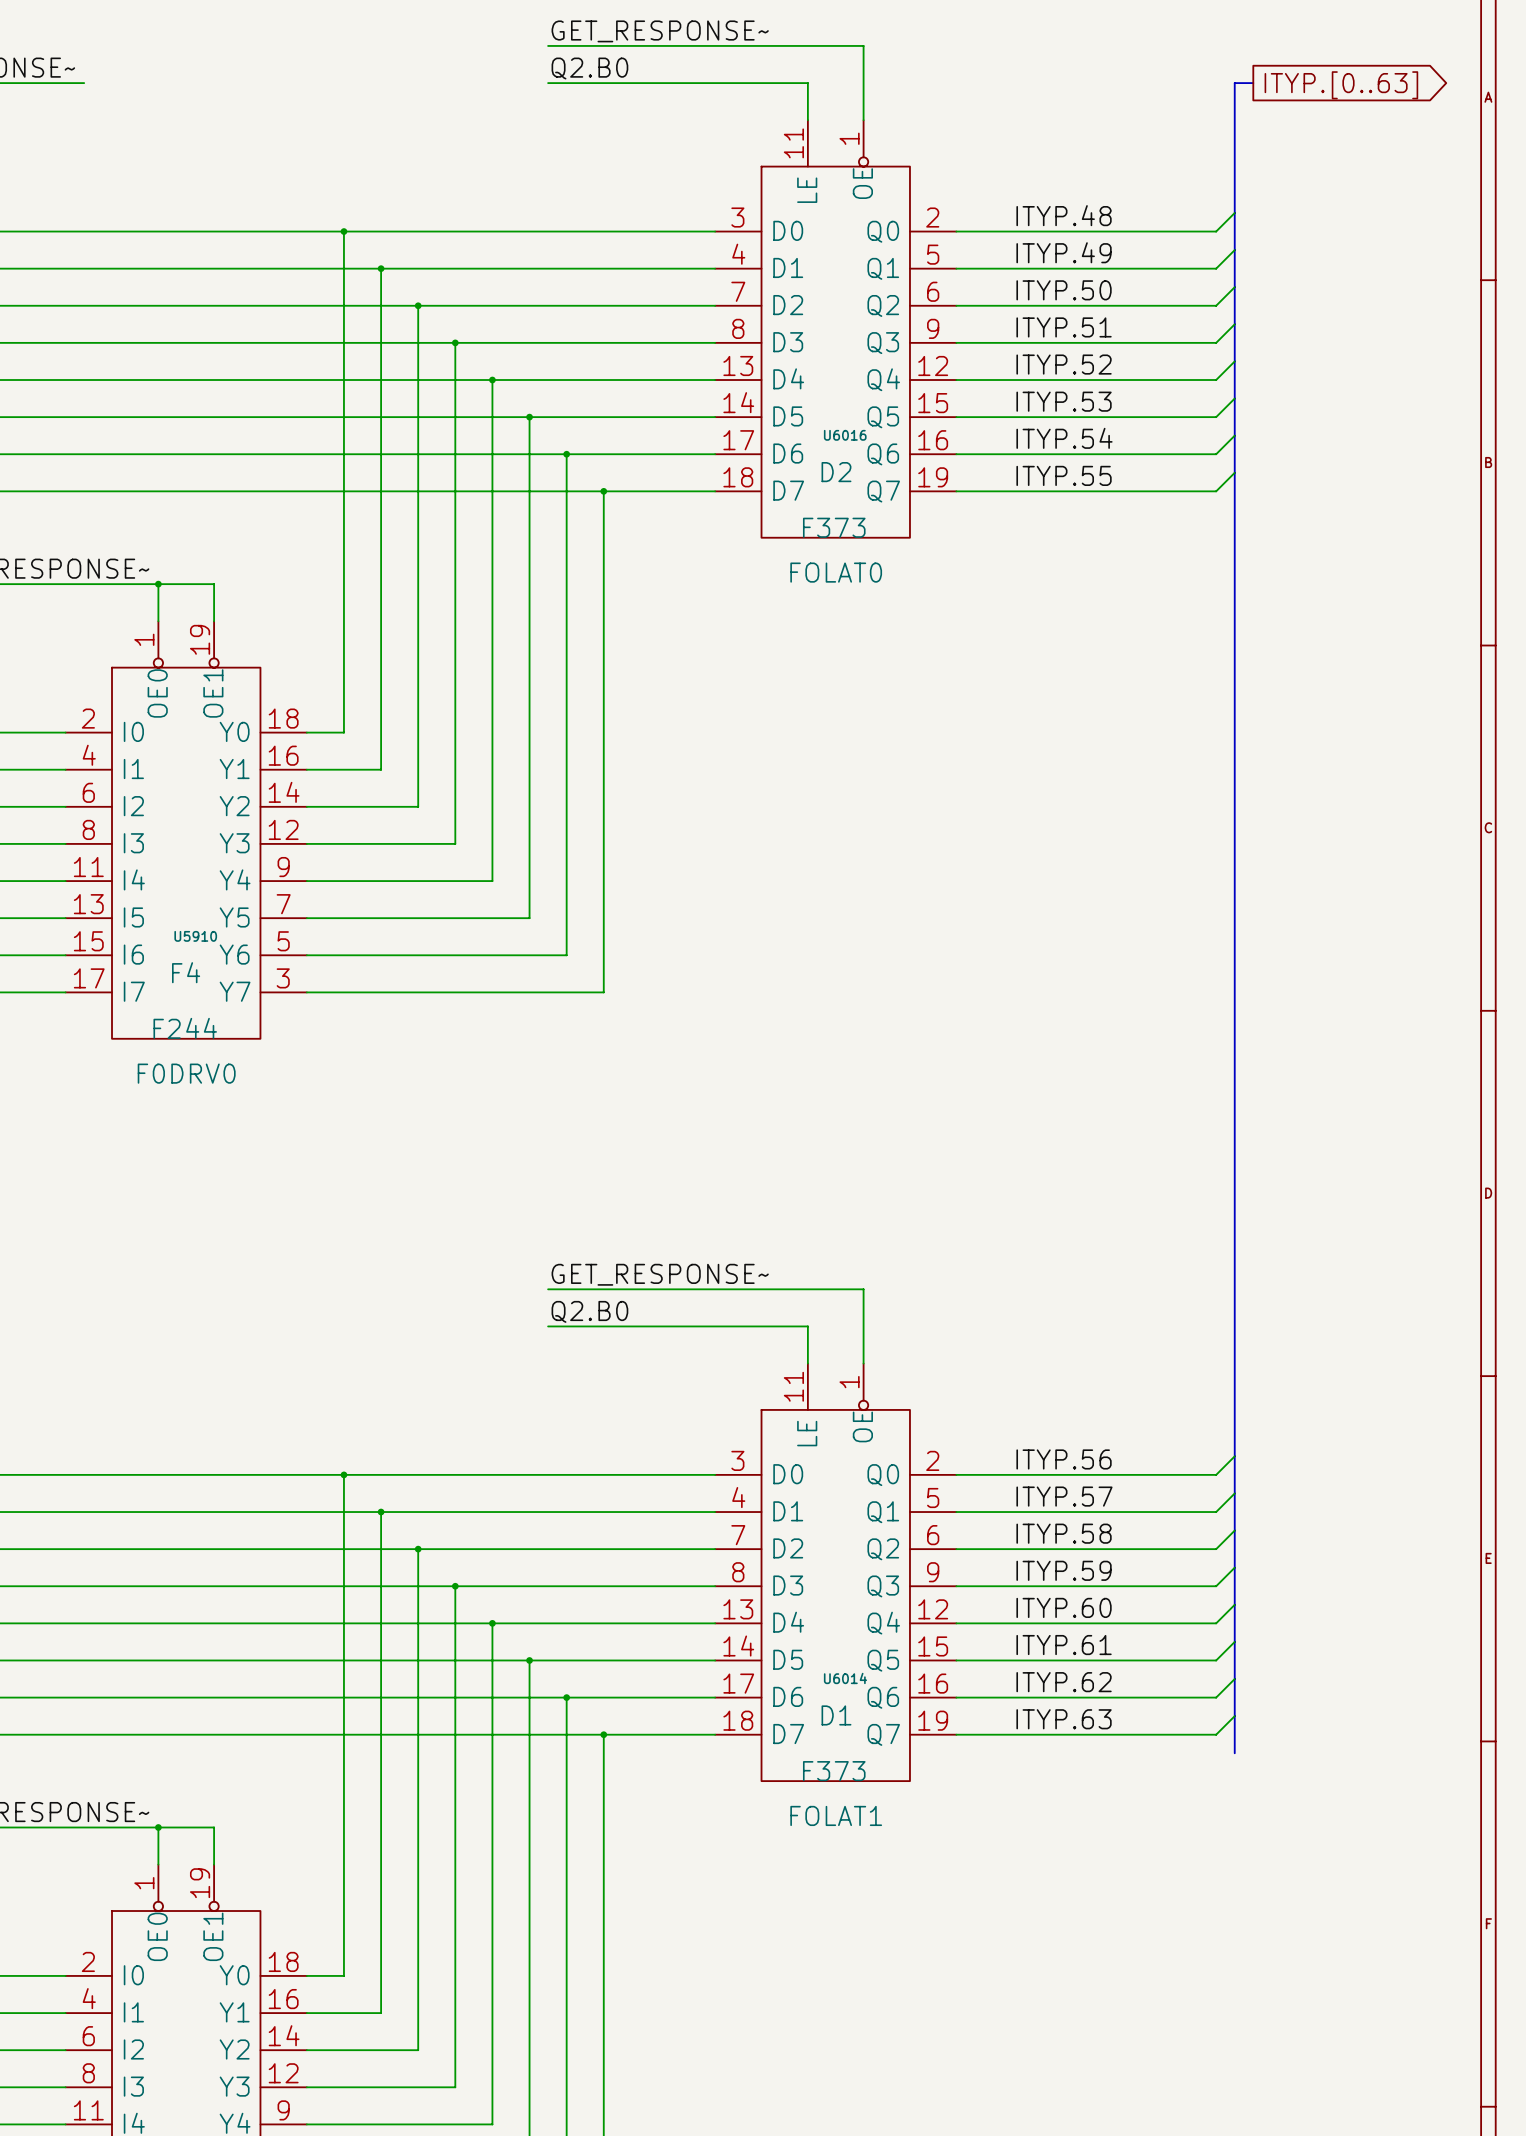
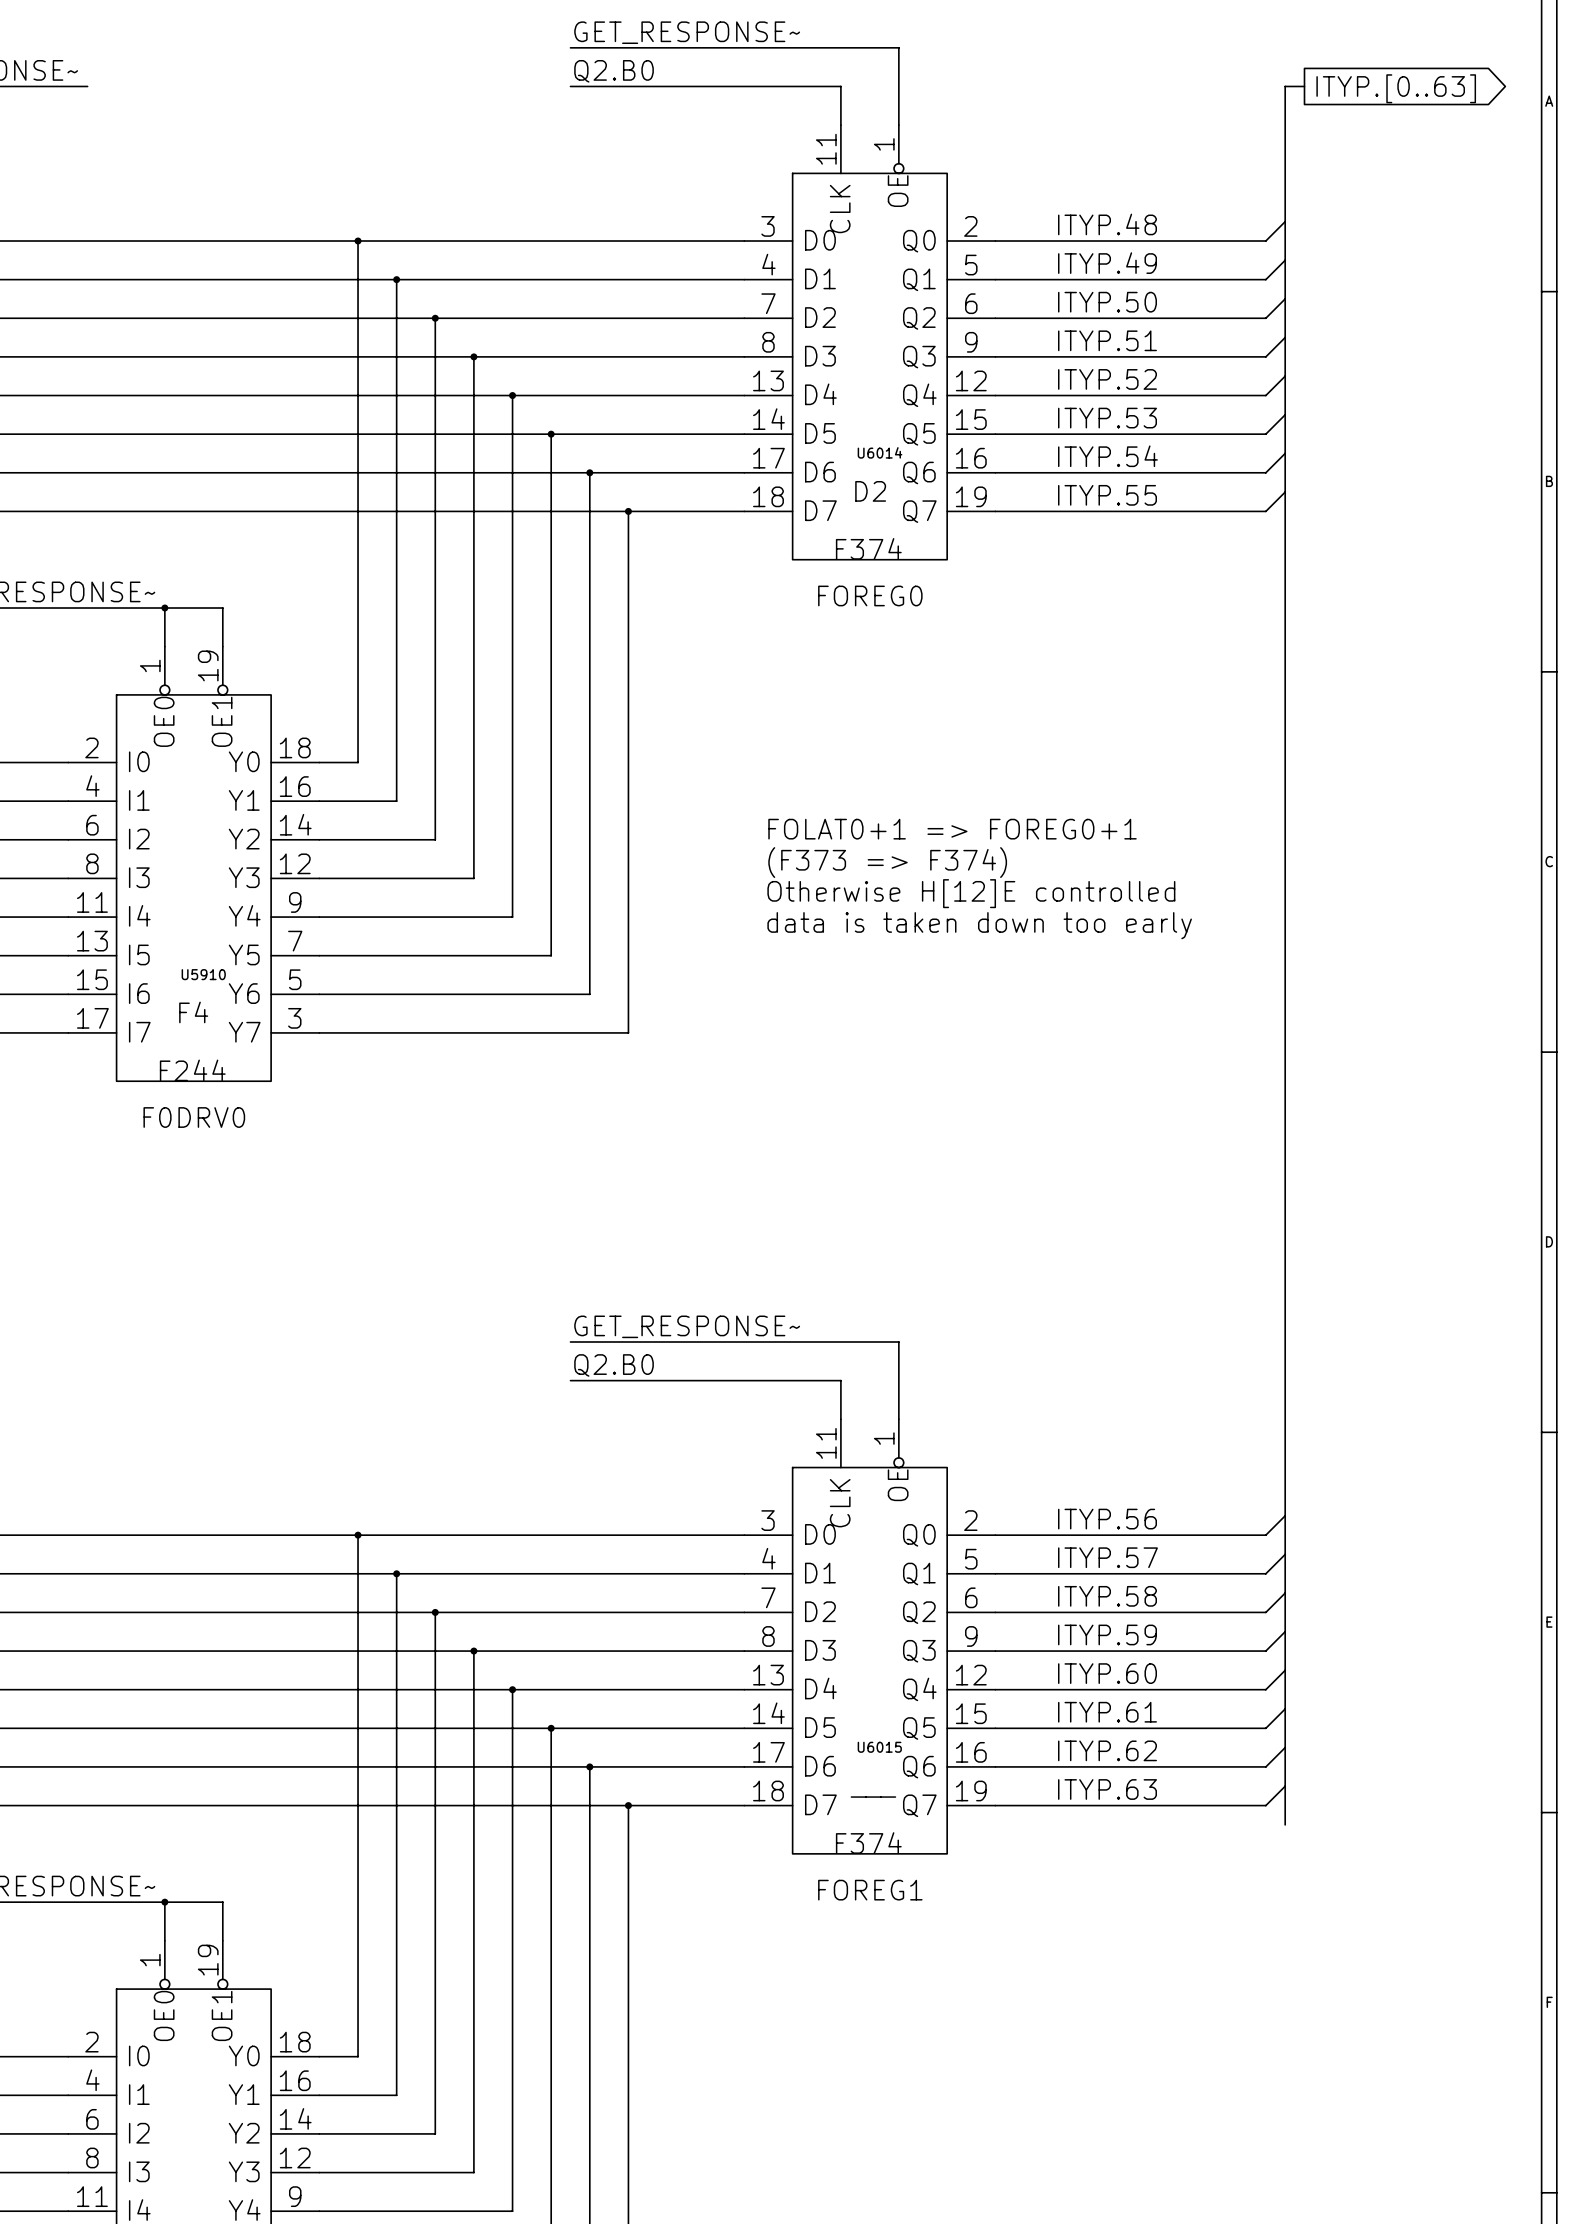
U6016: F373 (835, 328) -> none
text: none -> FOLAT0+1 => FOREG0+1 (952, 829)
text: none -> (F373 => F374) (887, 862)
text: none -> Otherwise H[12]E controlled (971, 893)
text: none -> data is taken down too early (979, 925)
U6014 pin name: LE (807, 1433) -> CLK (840, 209)
U6014 position: (835, 1572) -> (869, 342)
U6015: none -> F374 (869, 1636)
U6014 text: D1 (836, 1715) -> D2 (870, 491)
U6014 value: F373 (834, 1771) -> F374 (868, 548)
U6014 text: FOLAT1 (836, 1815) -> FOREG0 (870, 595)

